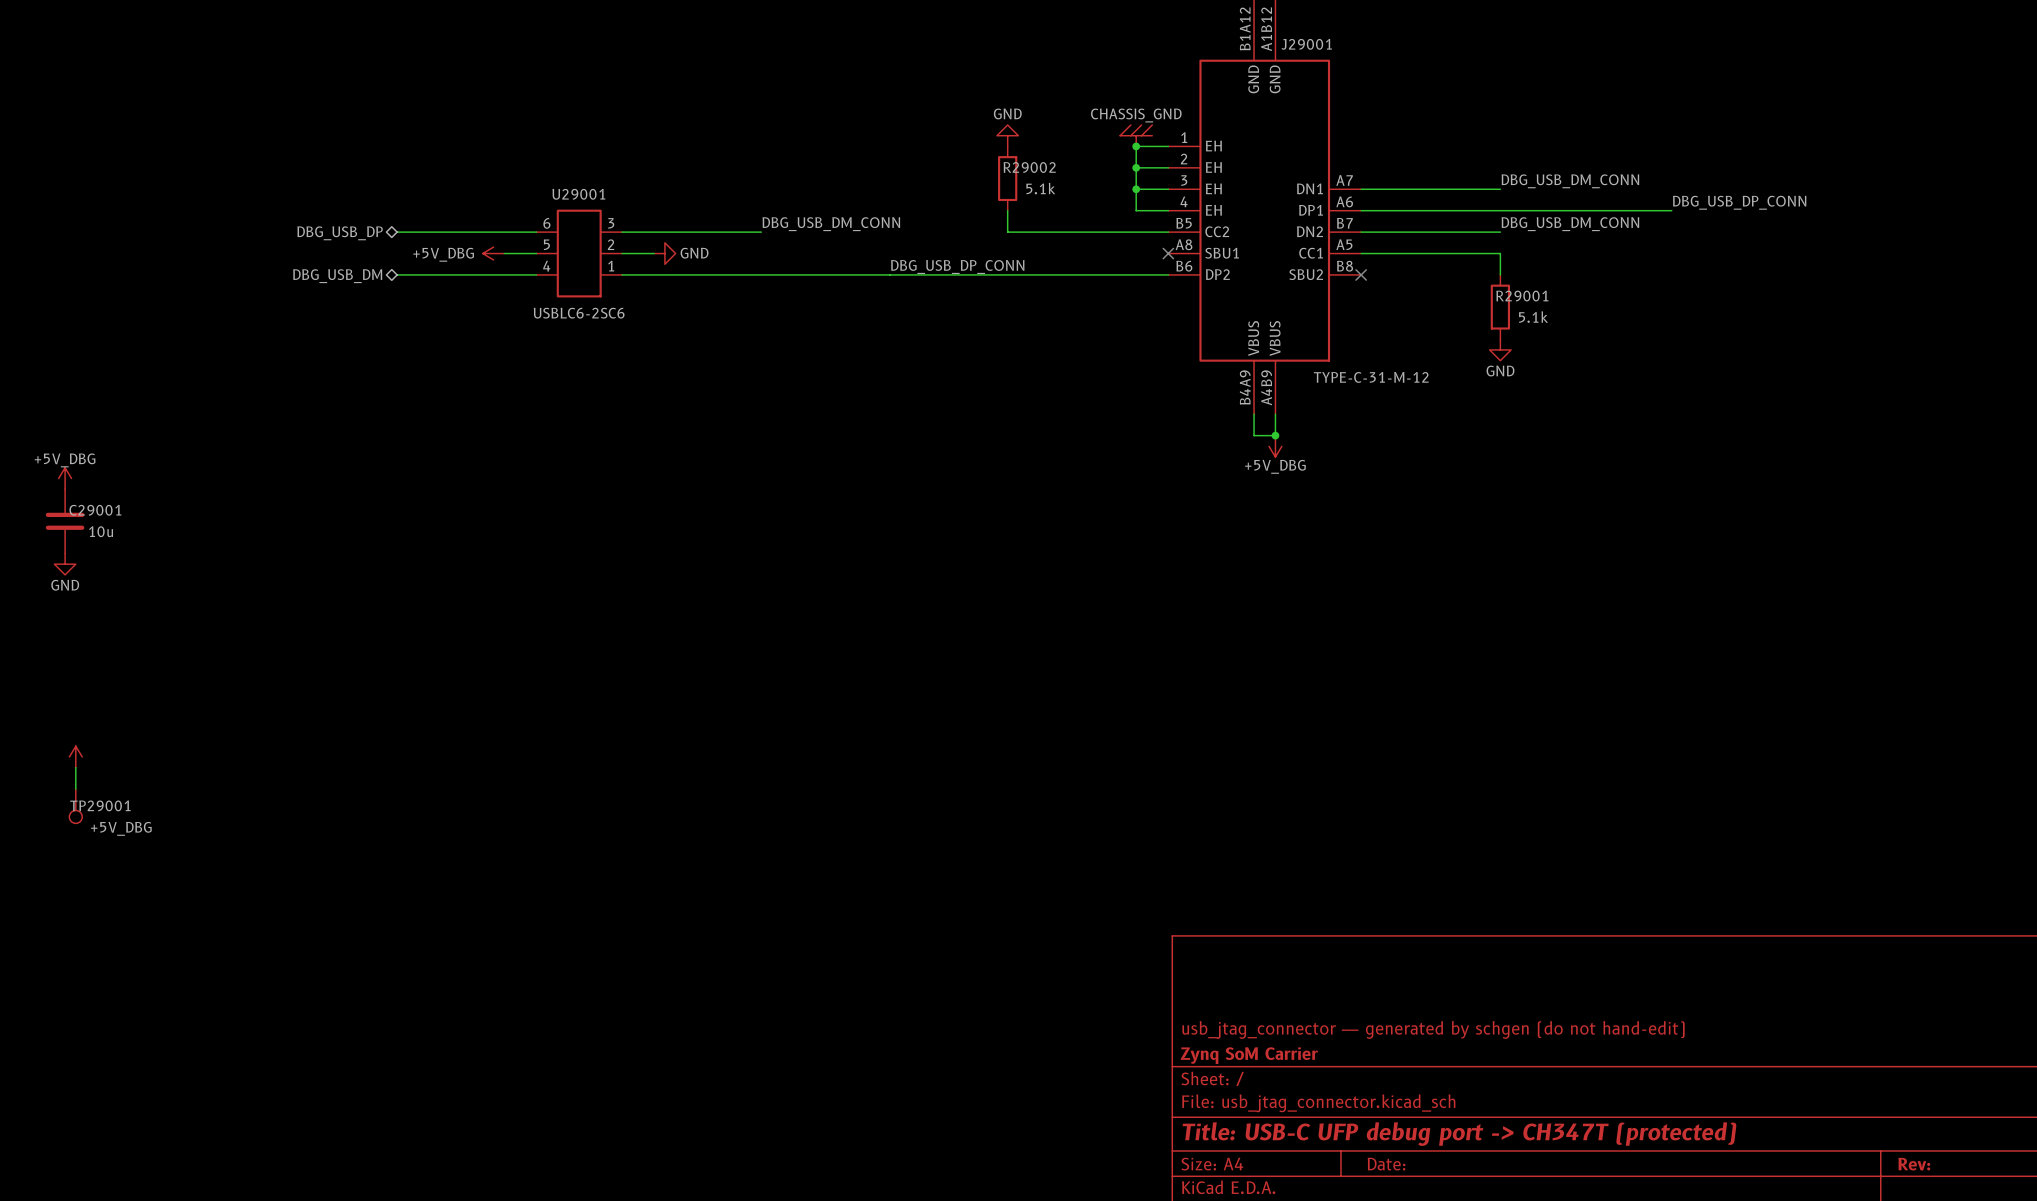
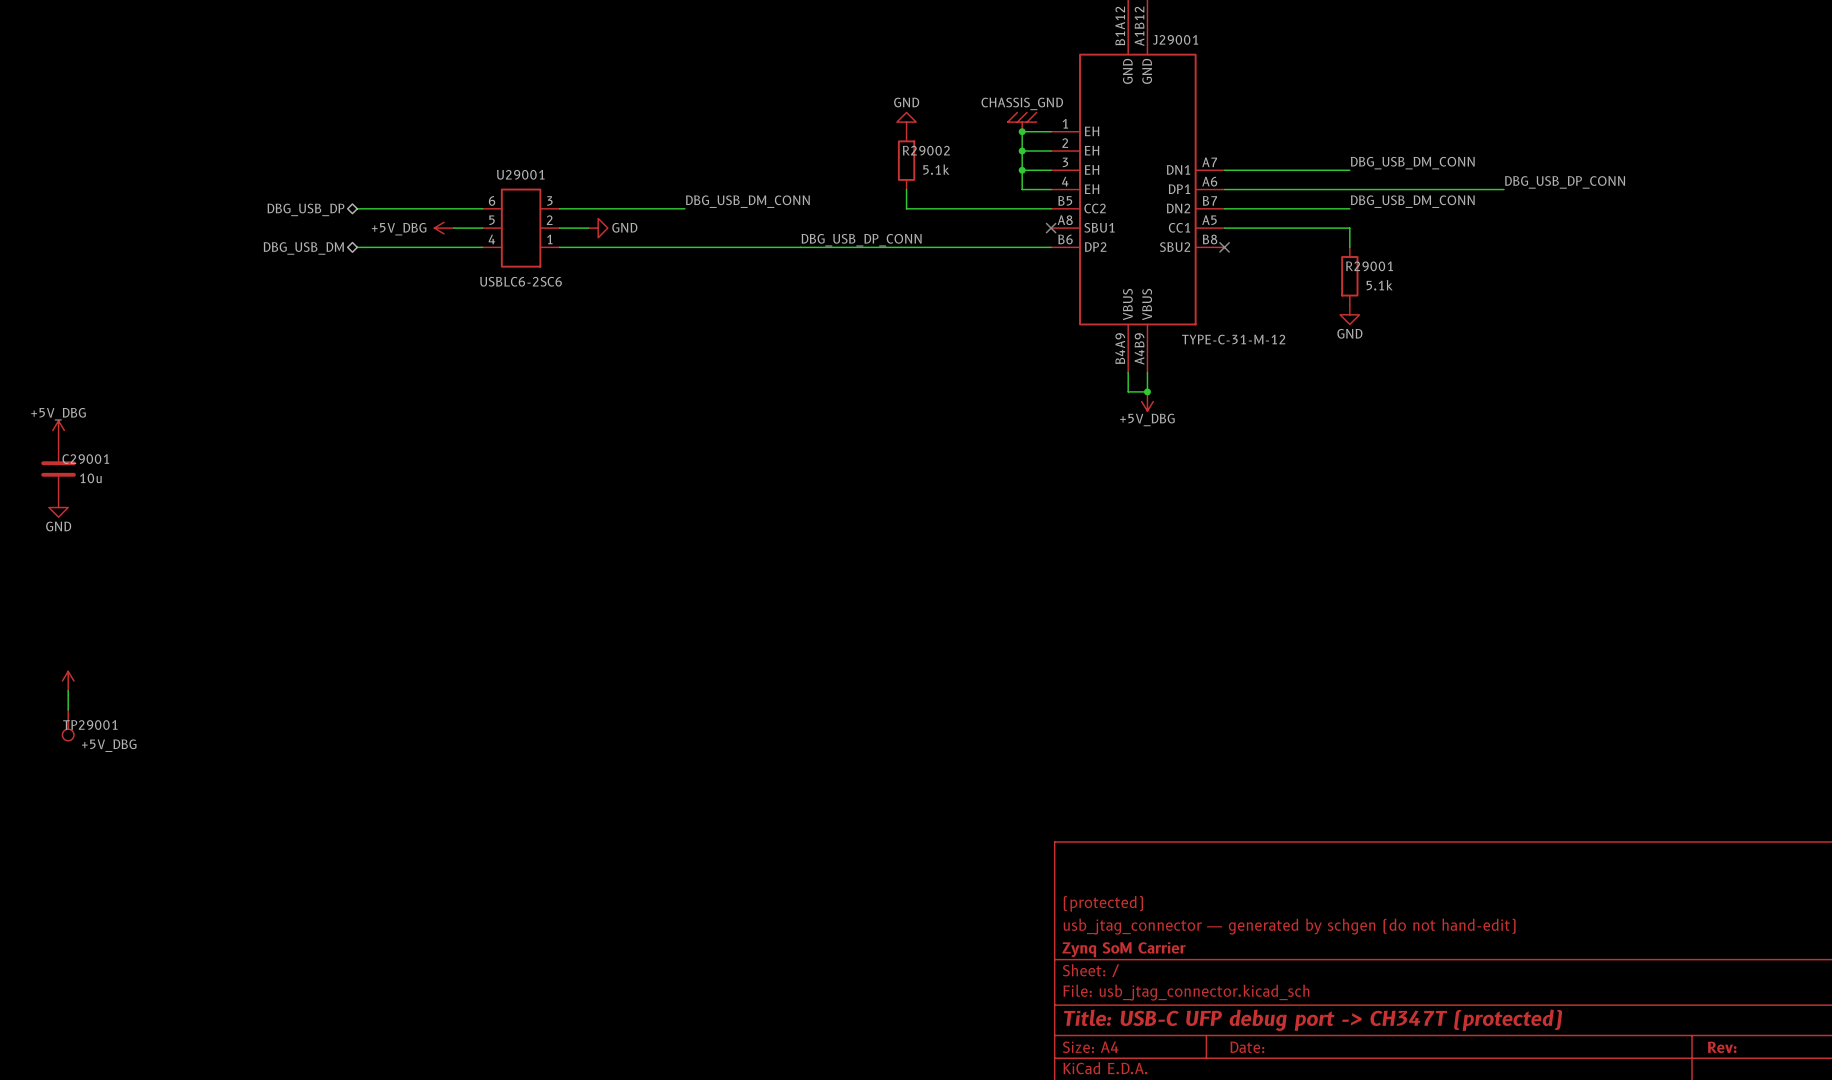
title block: none -> (protected) (1103, 903)

